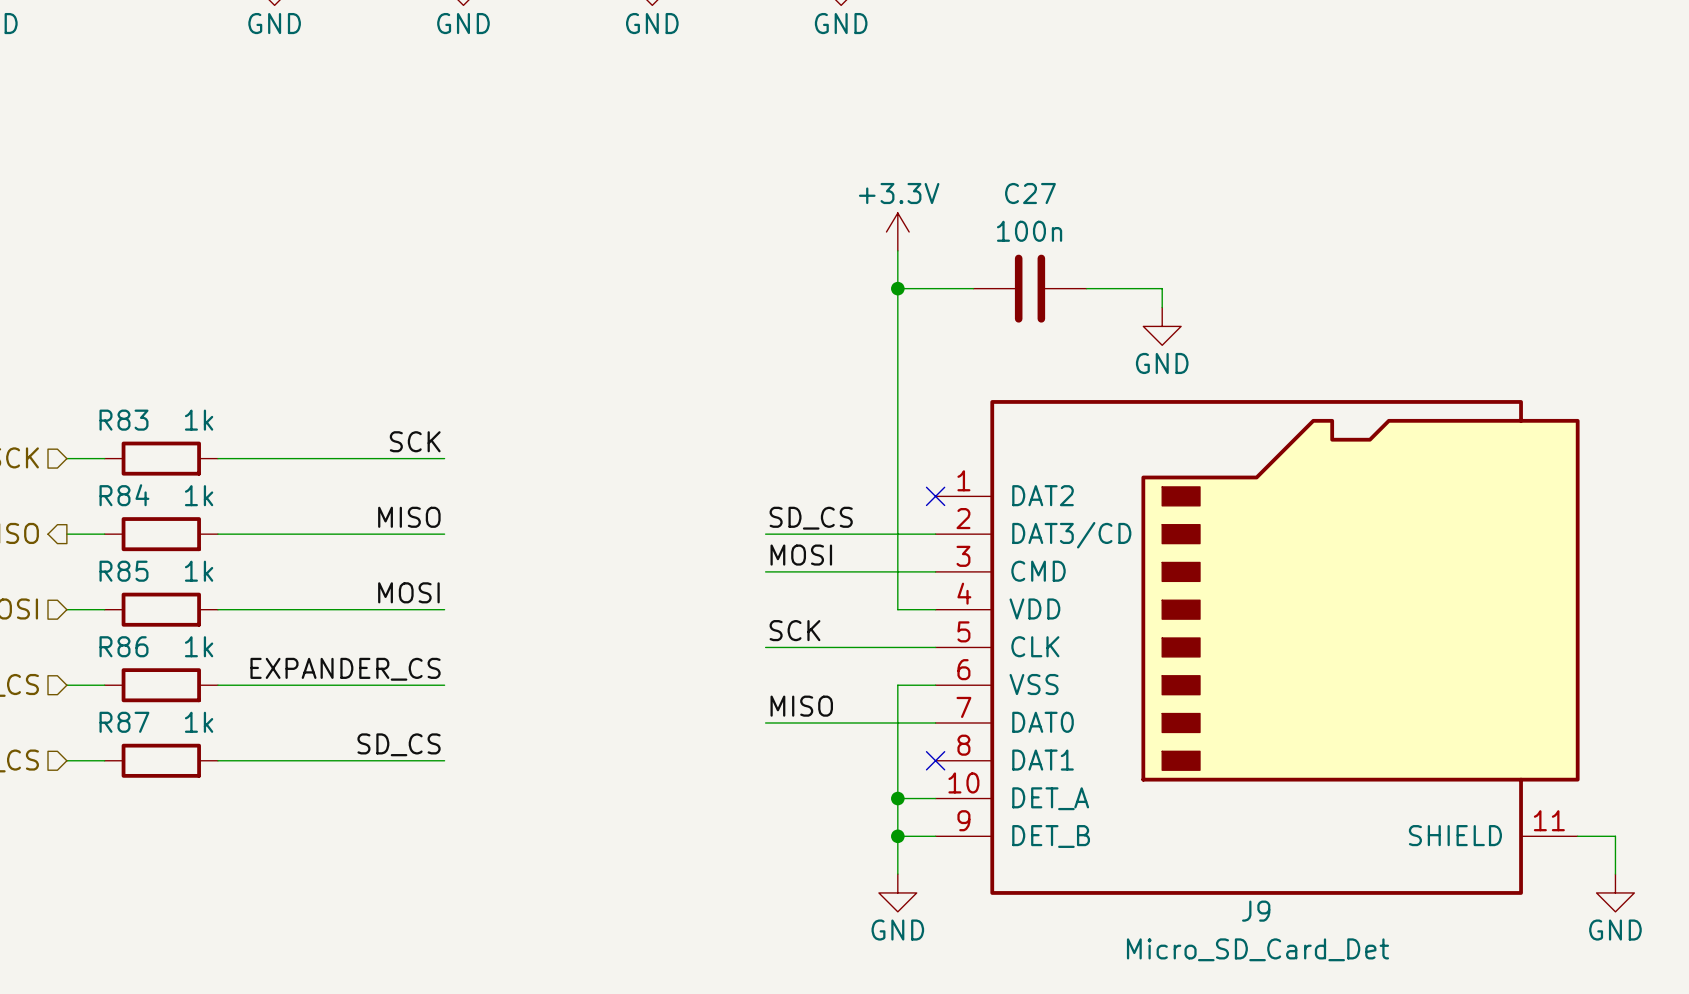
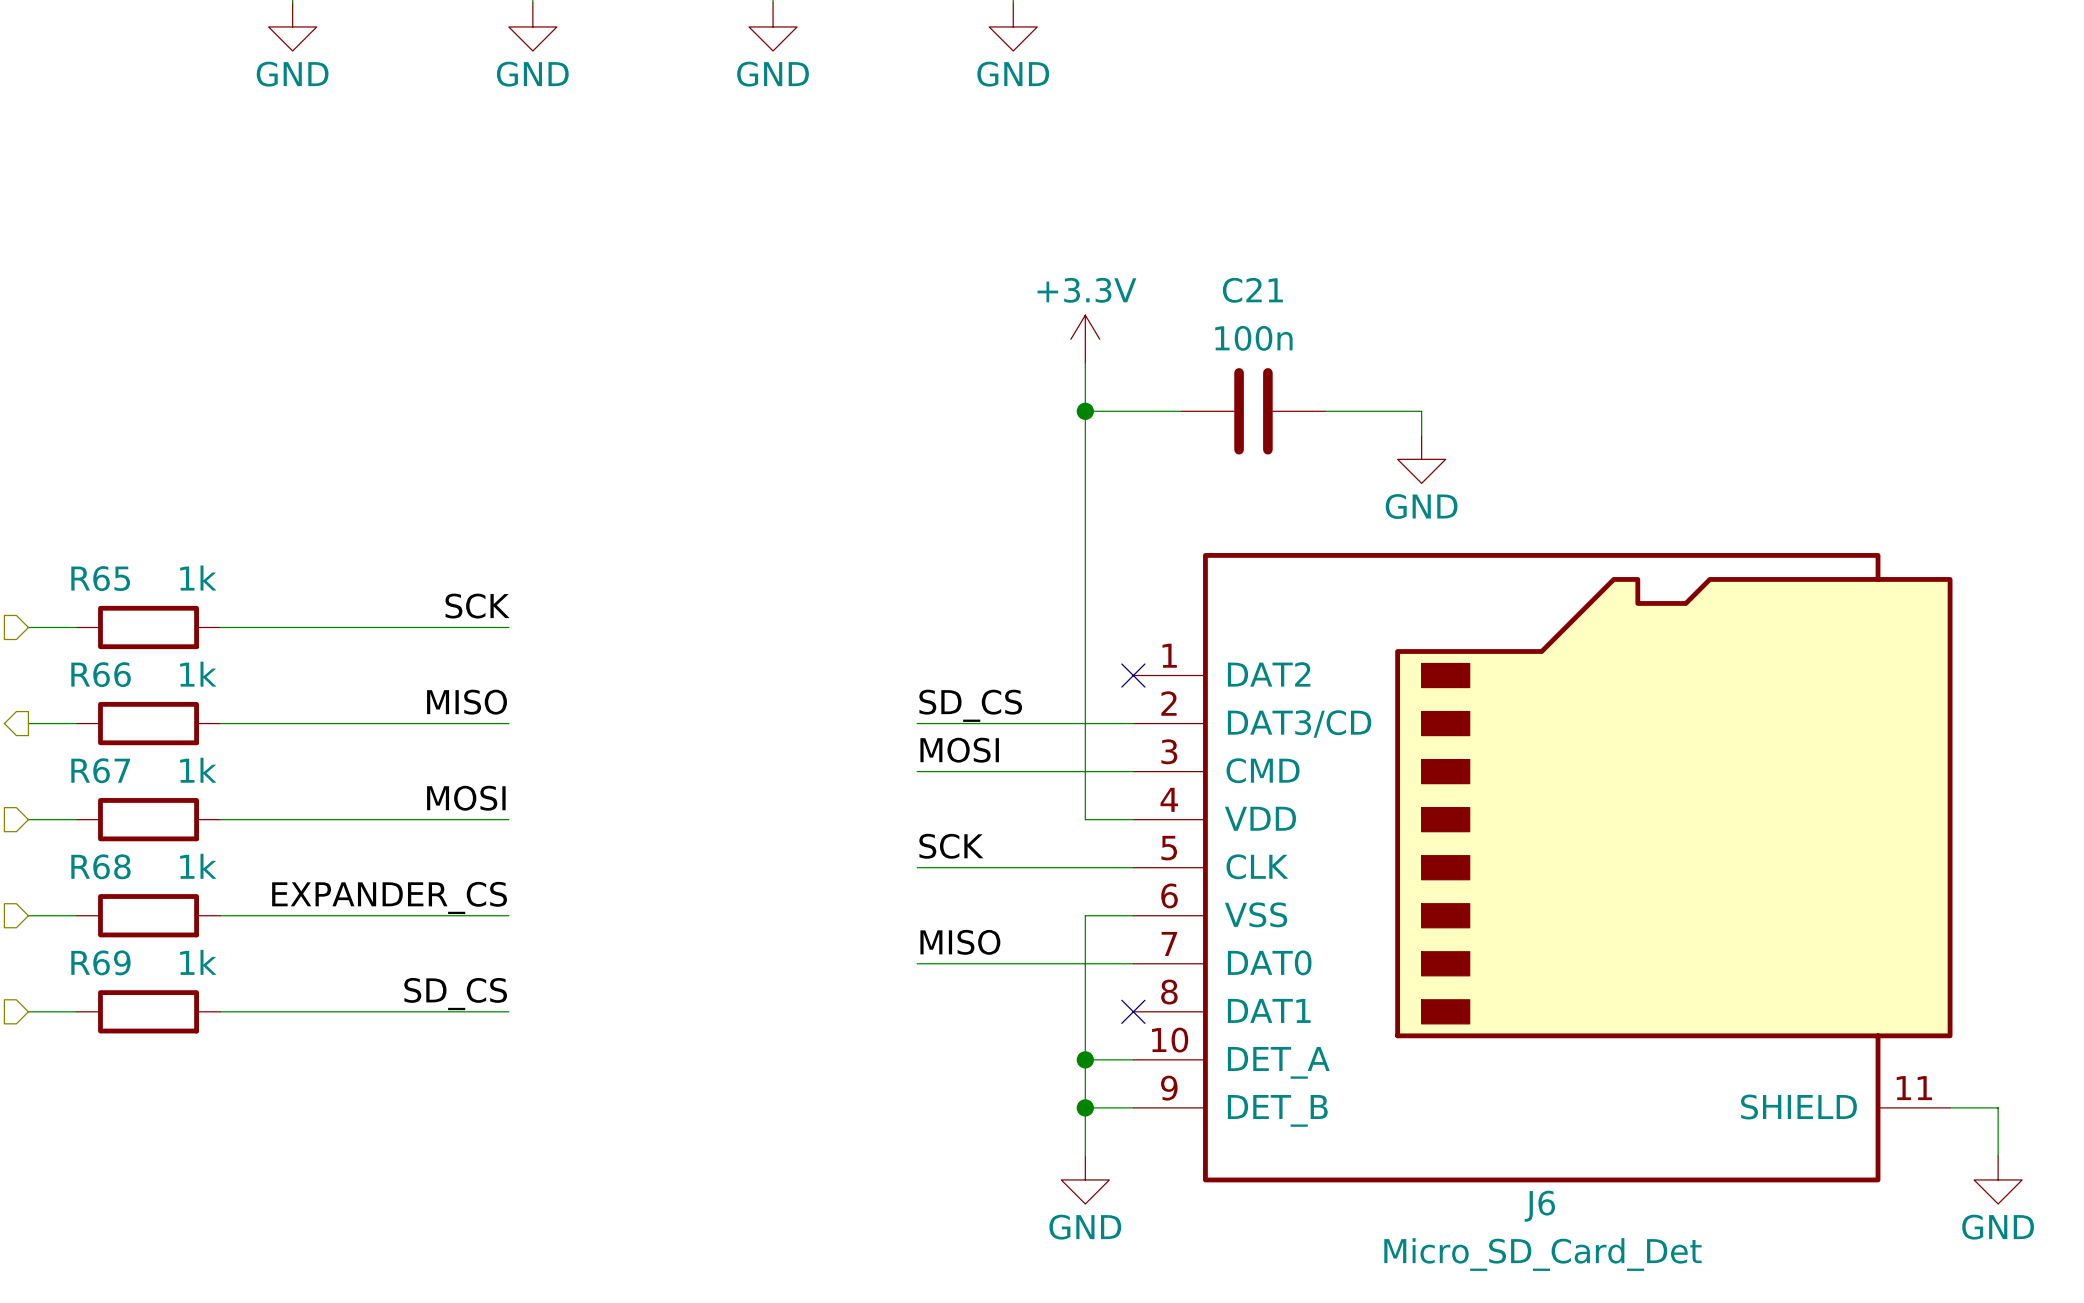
C27 name: C27 (1030, 193) -> C21 (1252, 290)
R83 name: R83 (123, 420) -> R65 (100, 578)
R84 name: R84 (124, 495) -> R66 (101, 674)
R85 name: R85 (123, 571) -> R67 (100, 770)
R86 name: R86 (123, 646) -> R68 (100, 866)
R87 name: R87 (124, 722) -> R69 (100, 962)
J9 name: J9 (1256, 911) -> J6 (1539, 1206)

